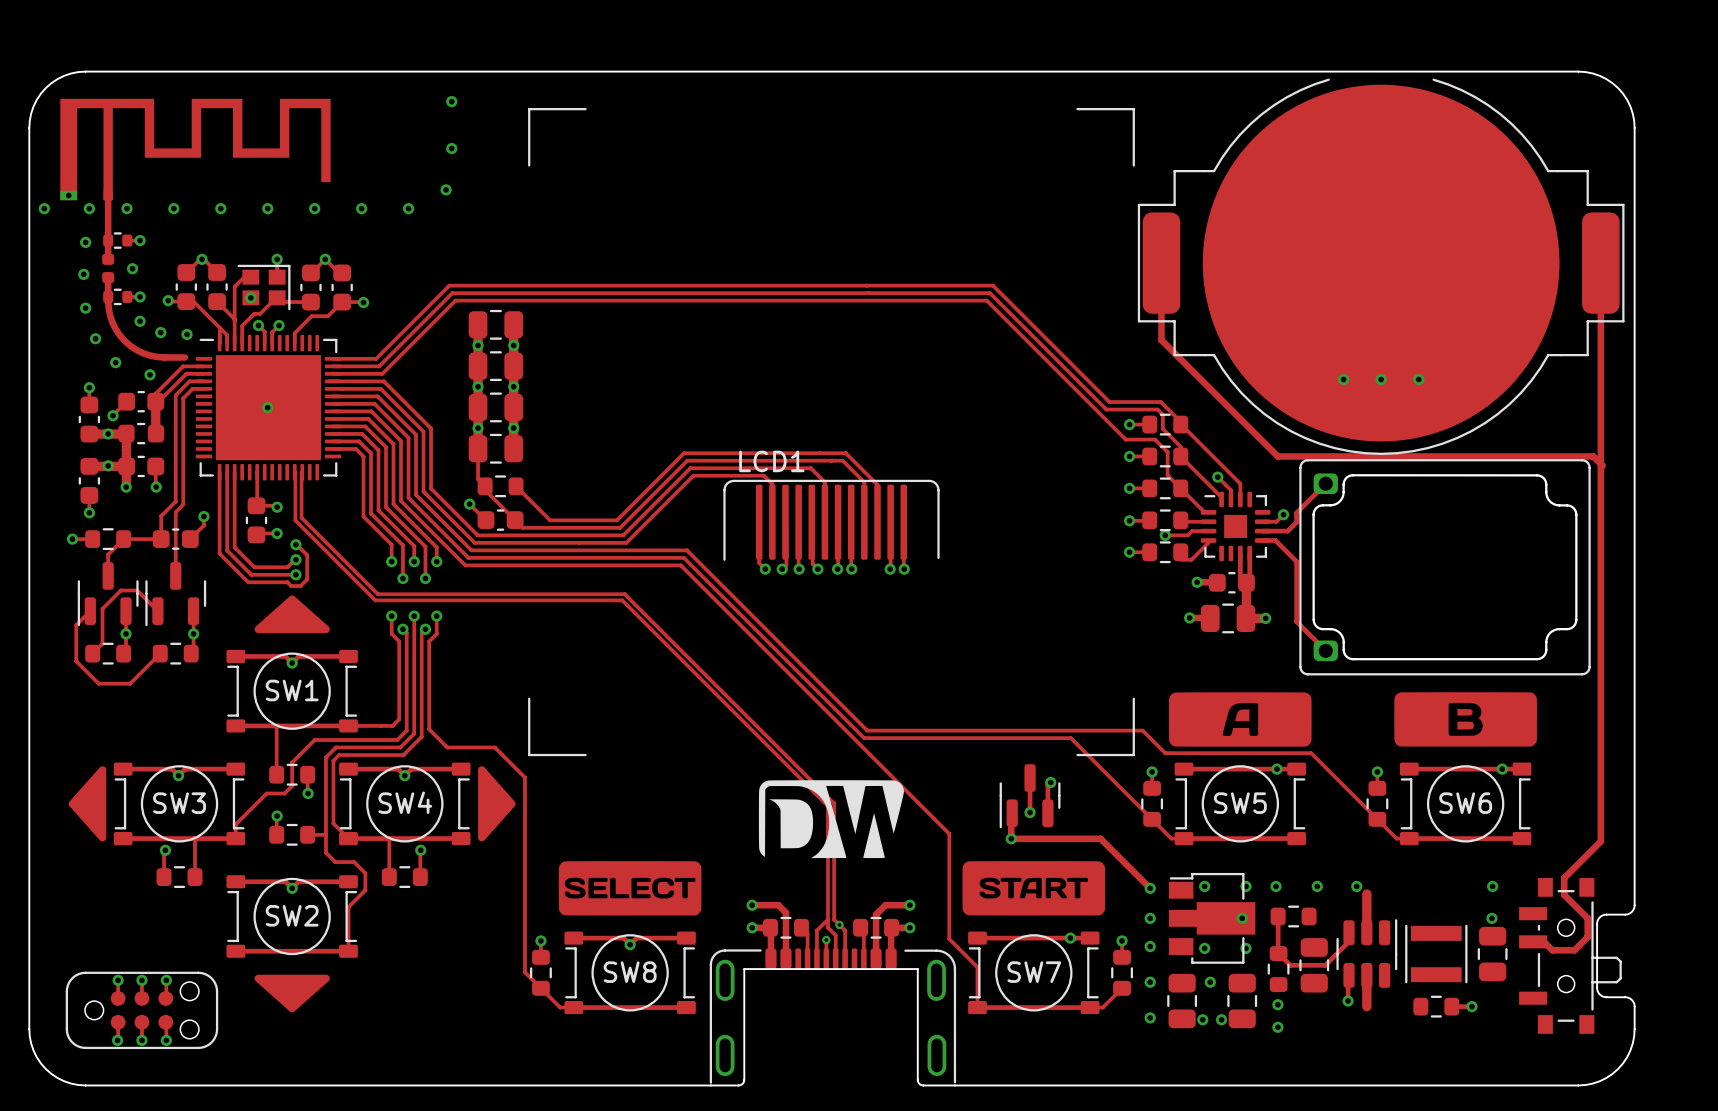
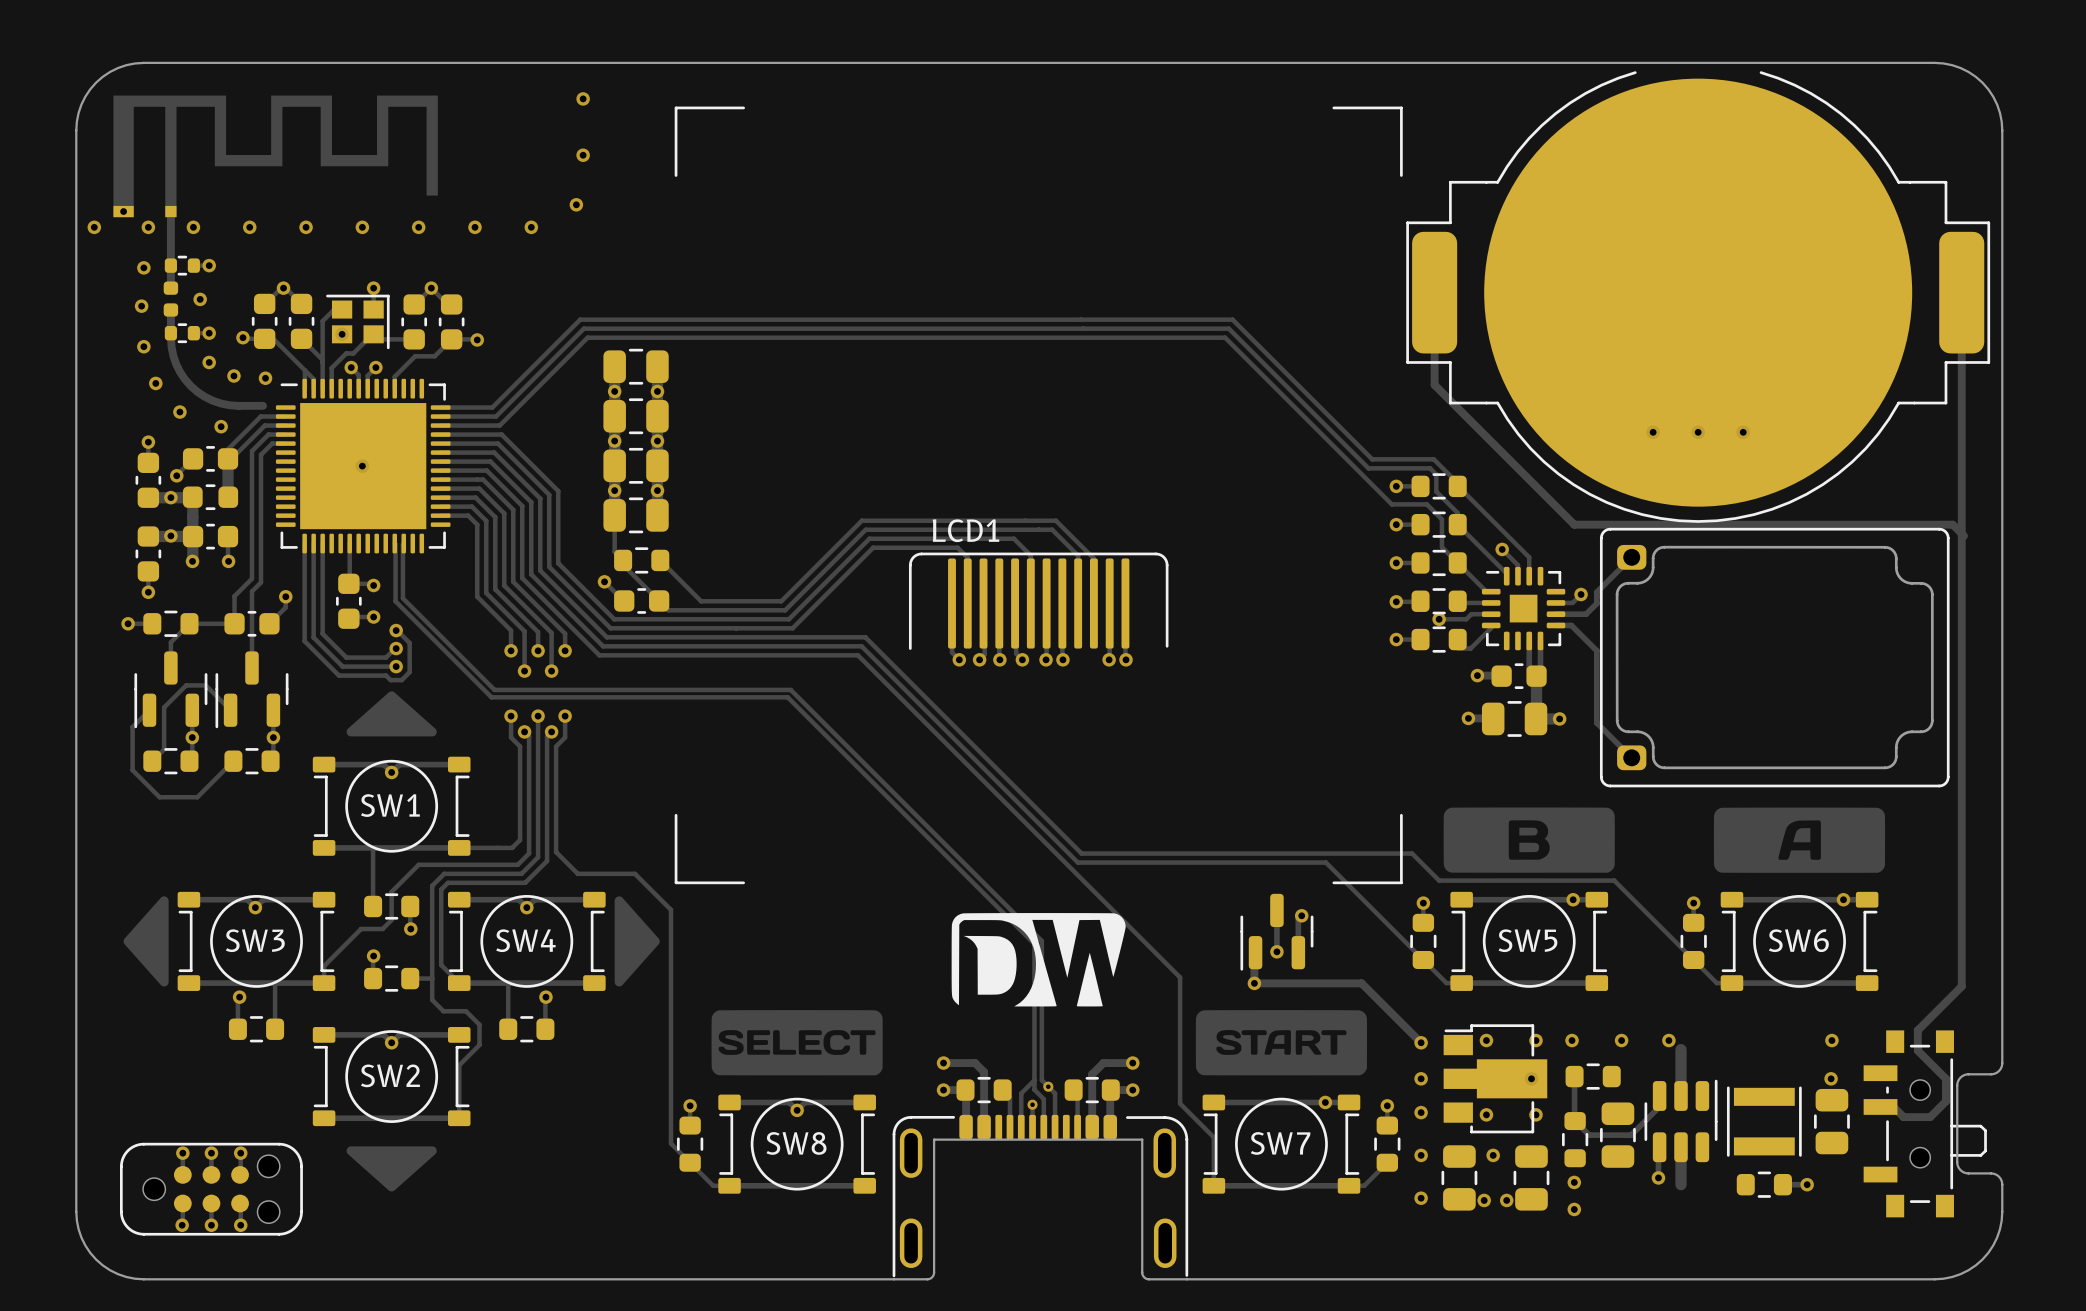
drawing position: (1240, 719) -> (1799, 840)
drawing position: (1465, 719) -> (1529, 840)

